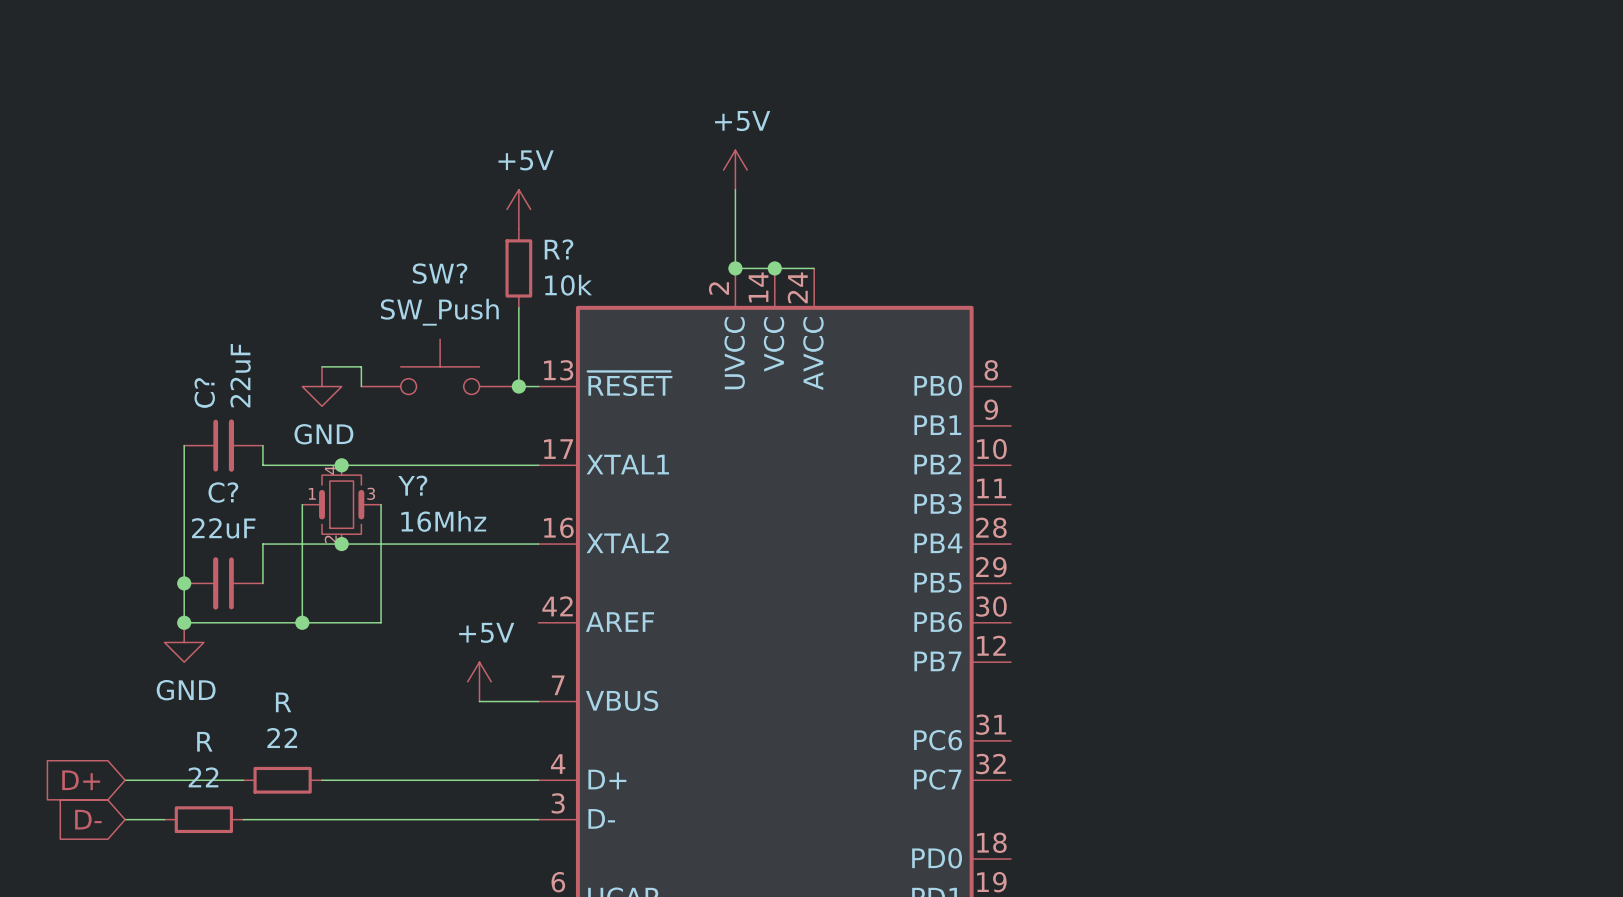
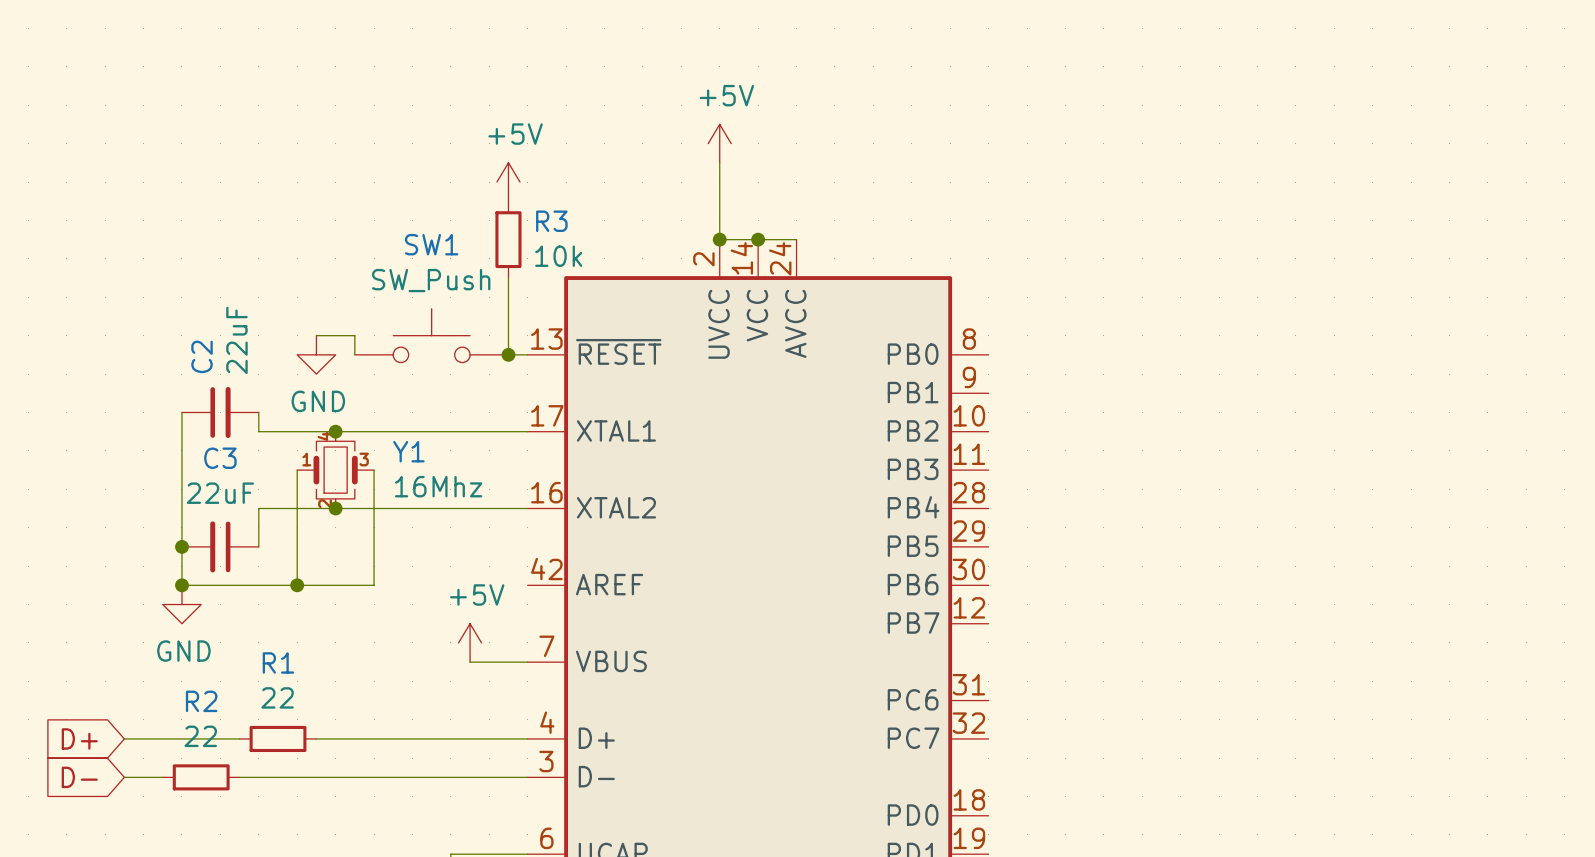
R? name: R? (559, 249) -> R3 (551, 221)
SW? name: SW? (440, 273) -> SW1 (431, 244)
C? name: C? (204, 392) -> C2 (202, 356)
Y? name: Y? (412, 485) -> Y1 (408, 451)
C? name: C? (223, 492) -> C3 (220, 458)
R name: R (283, 702) -> R1 (278, 662)
R name: R (204, 741) -> R2 (201, 701)

